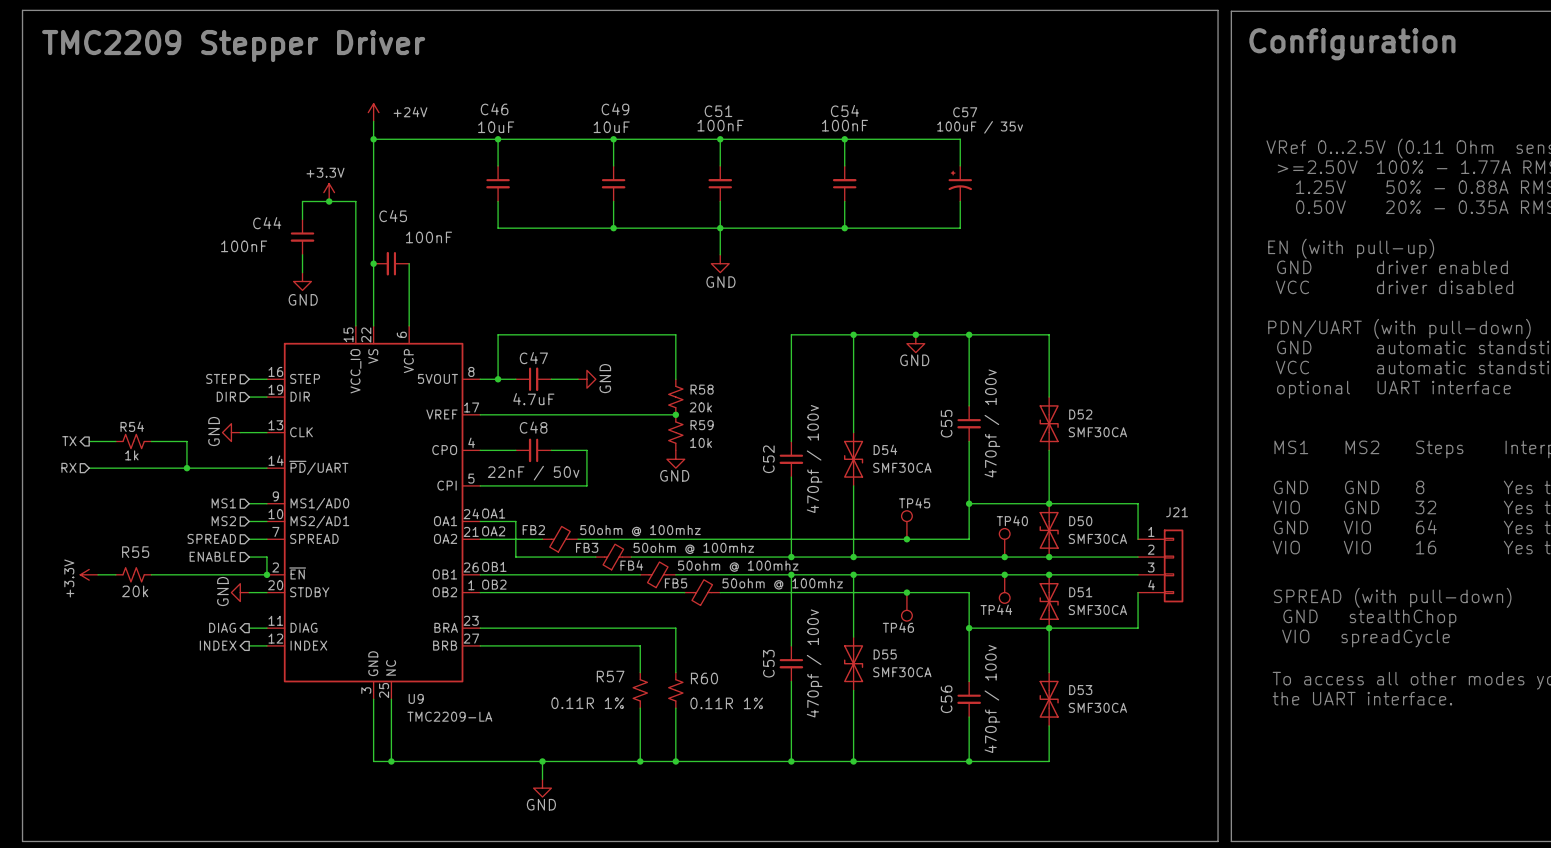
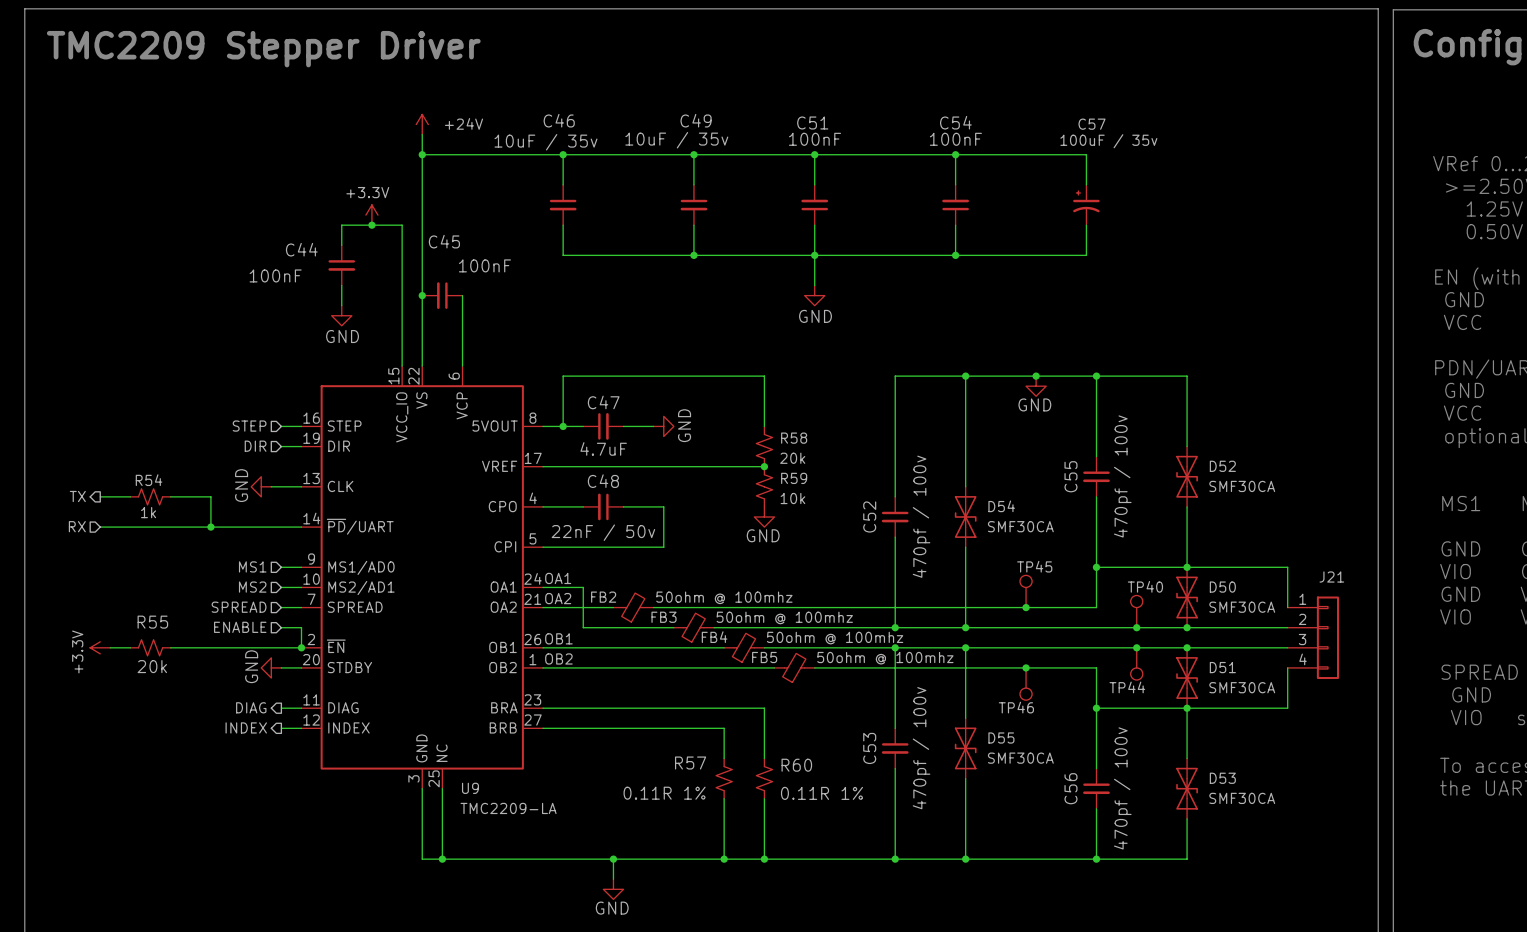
C46 value: 10uF (496, 127) -> 10uF / 35v (545, 142)
C49 value: 10uF (611, 127) -> 10uF / 35v (676, 140)

